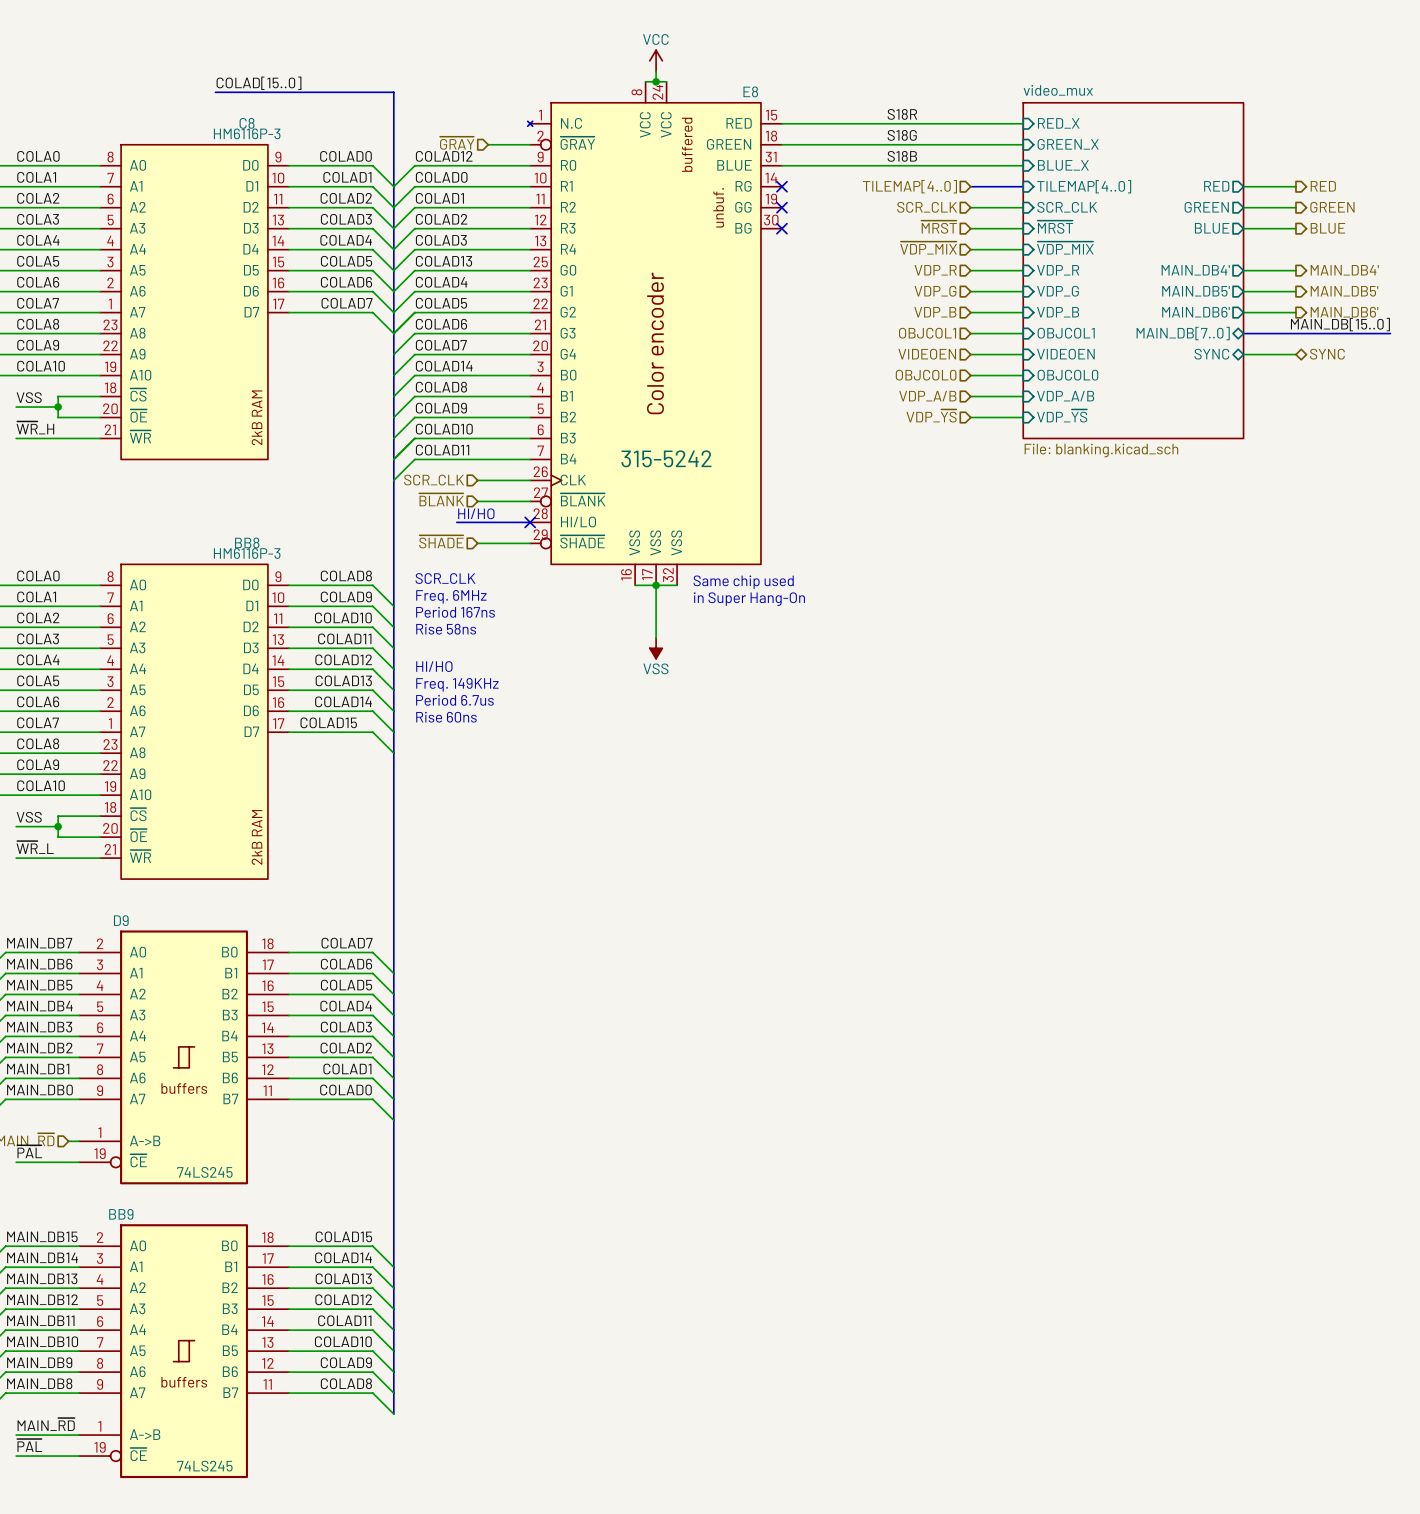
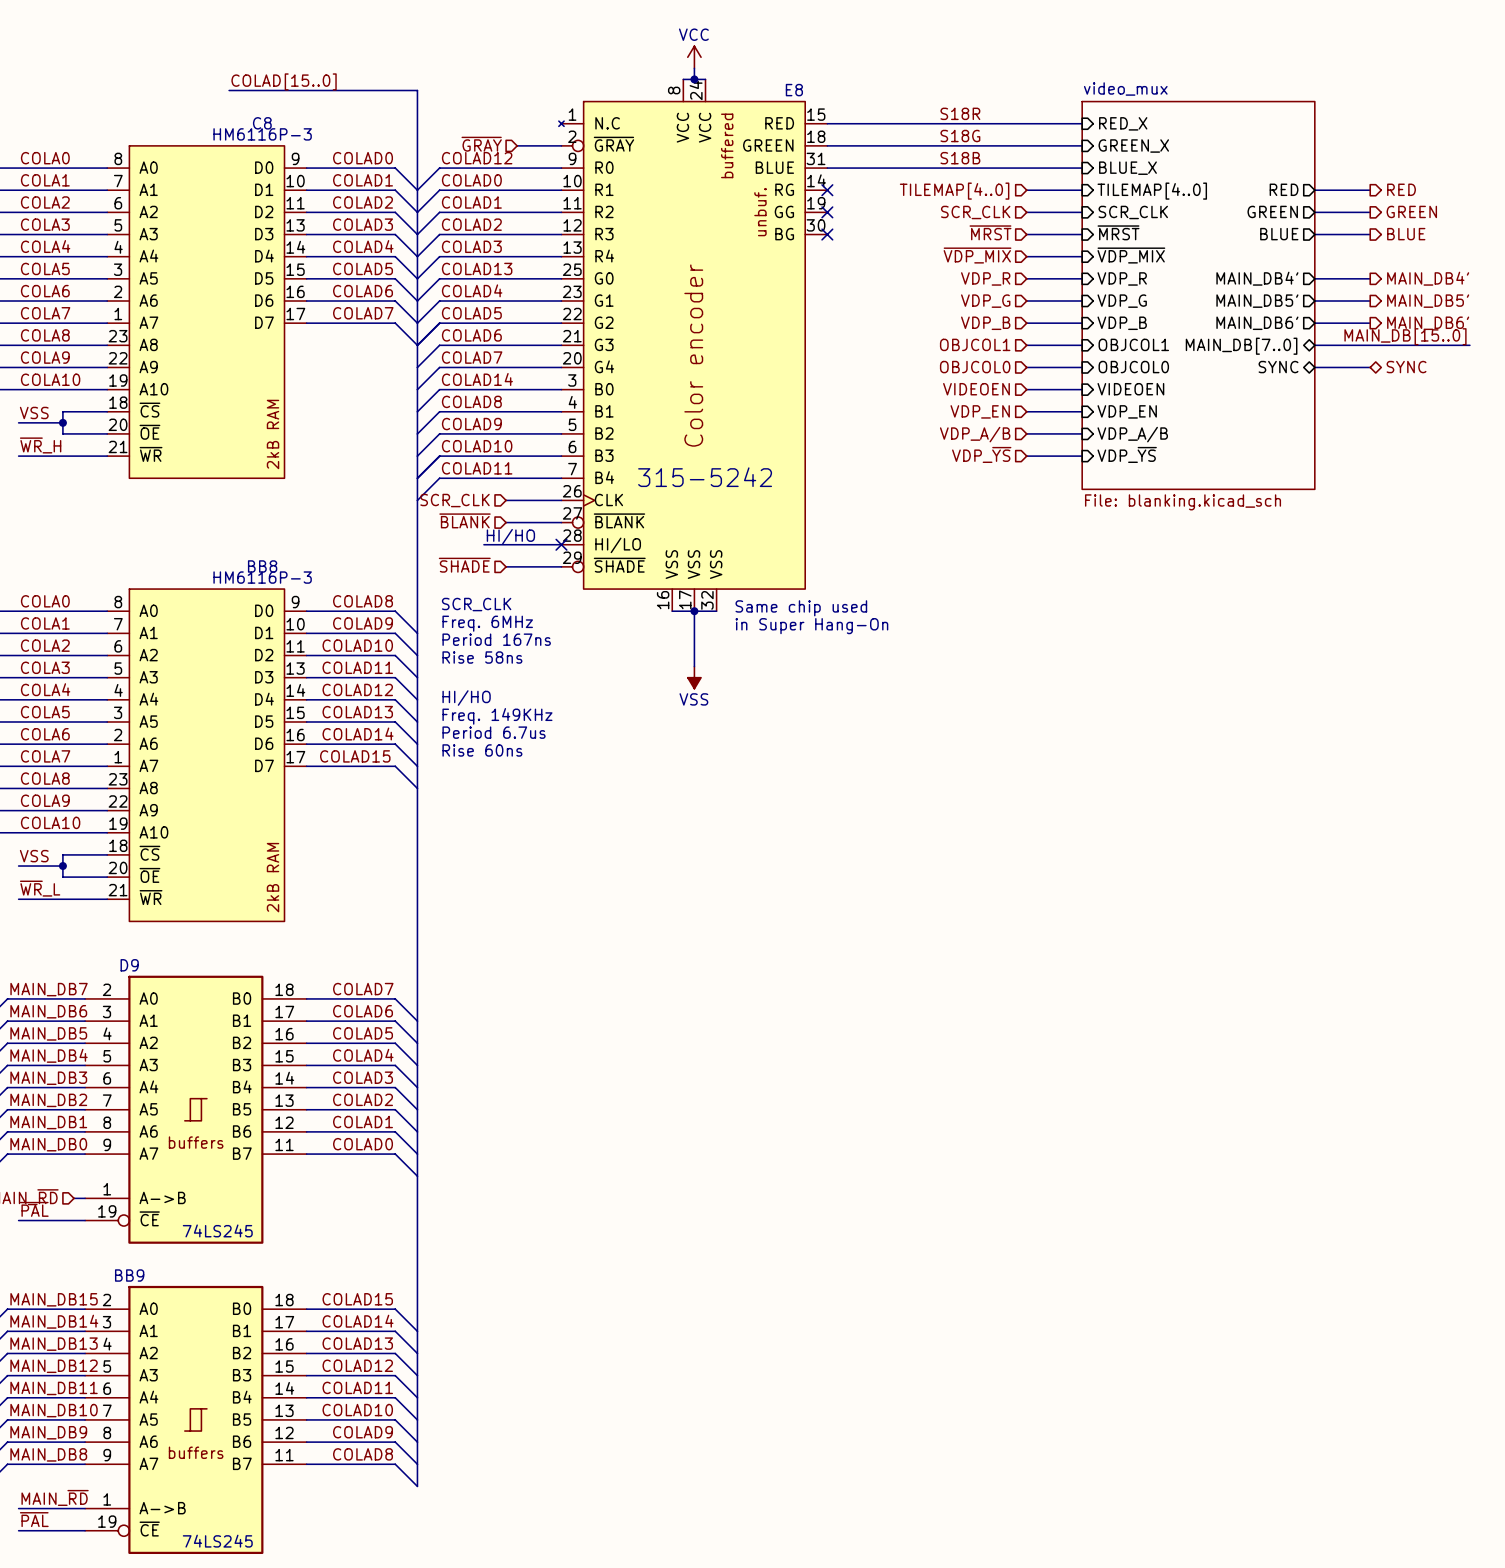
sheet video_mux: File: blanking.kicad_sch (1133, 270) -> none
sheet video_mux: none -> File: blanking.kicad_sch (1198, 295)
hierarchical label: VIDEOEN (927, 354) -> OBJCOL0 (975, 367)
sheet pin: VIDEOEN (1065, 354) -> OBJCOL0 (1133, 367)
hierarchical label: OBJCOL0 (926, 375) -> VIDEOEN (976, 389)
sheet pin: OBJCOL0 (1067, 375) -> VIDEOEN (1130, 389)
hierarchical label: VDP_A/B (927, 396) -> VDP_EN (980, 411)
sheet pin: VDP_A/B (1065, 396) -> VDP_EN (1127, 411)
hierarchical label: VDP_~{YS} (931, 415) -> VDP_A/B (975, 434)
sheet pin: VDP_~{YS} (1062, 415) -> VDP_A/B (1132, 434)
hierarchical label: none -> VDP_~{YS} (981, 454)
sheet pin: none -> VDP_~{YS} (1127, 454)
wire: none -> (1026, 456) (1082, 456)

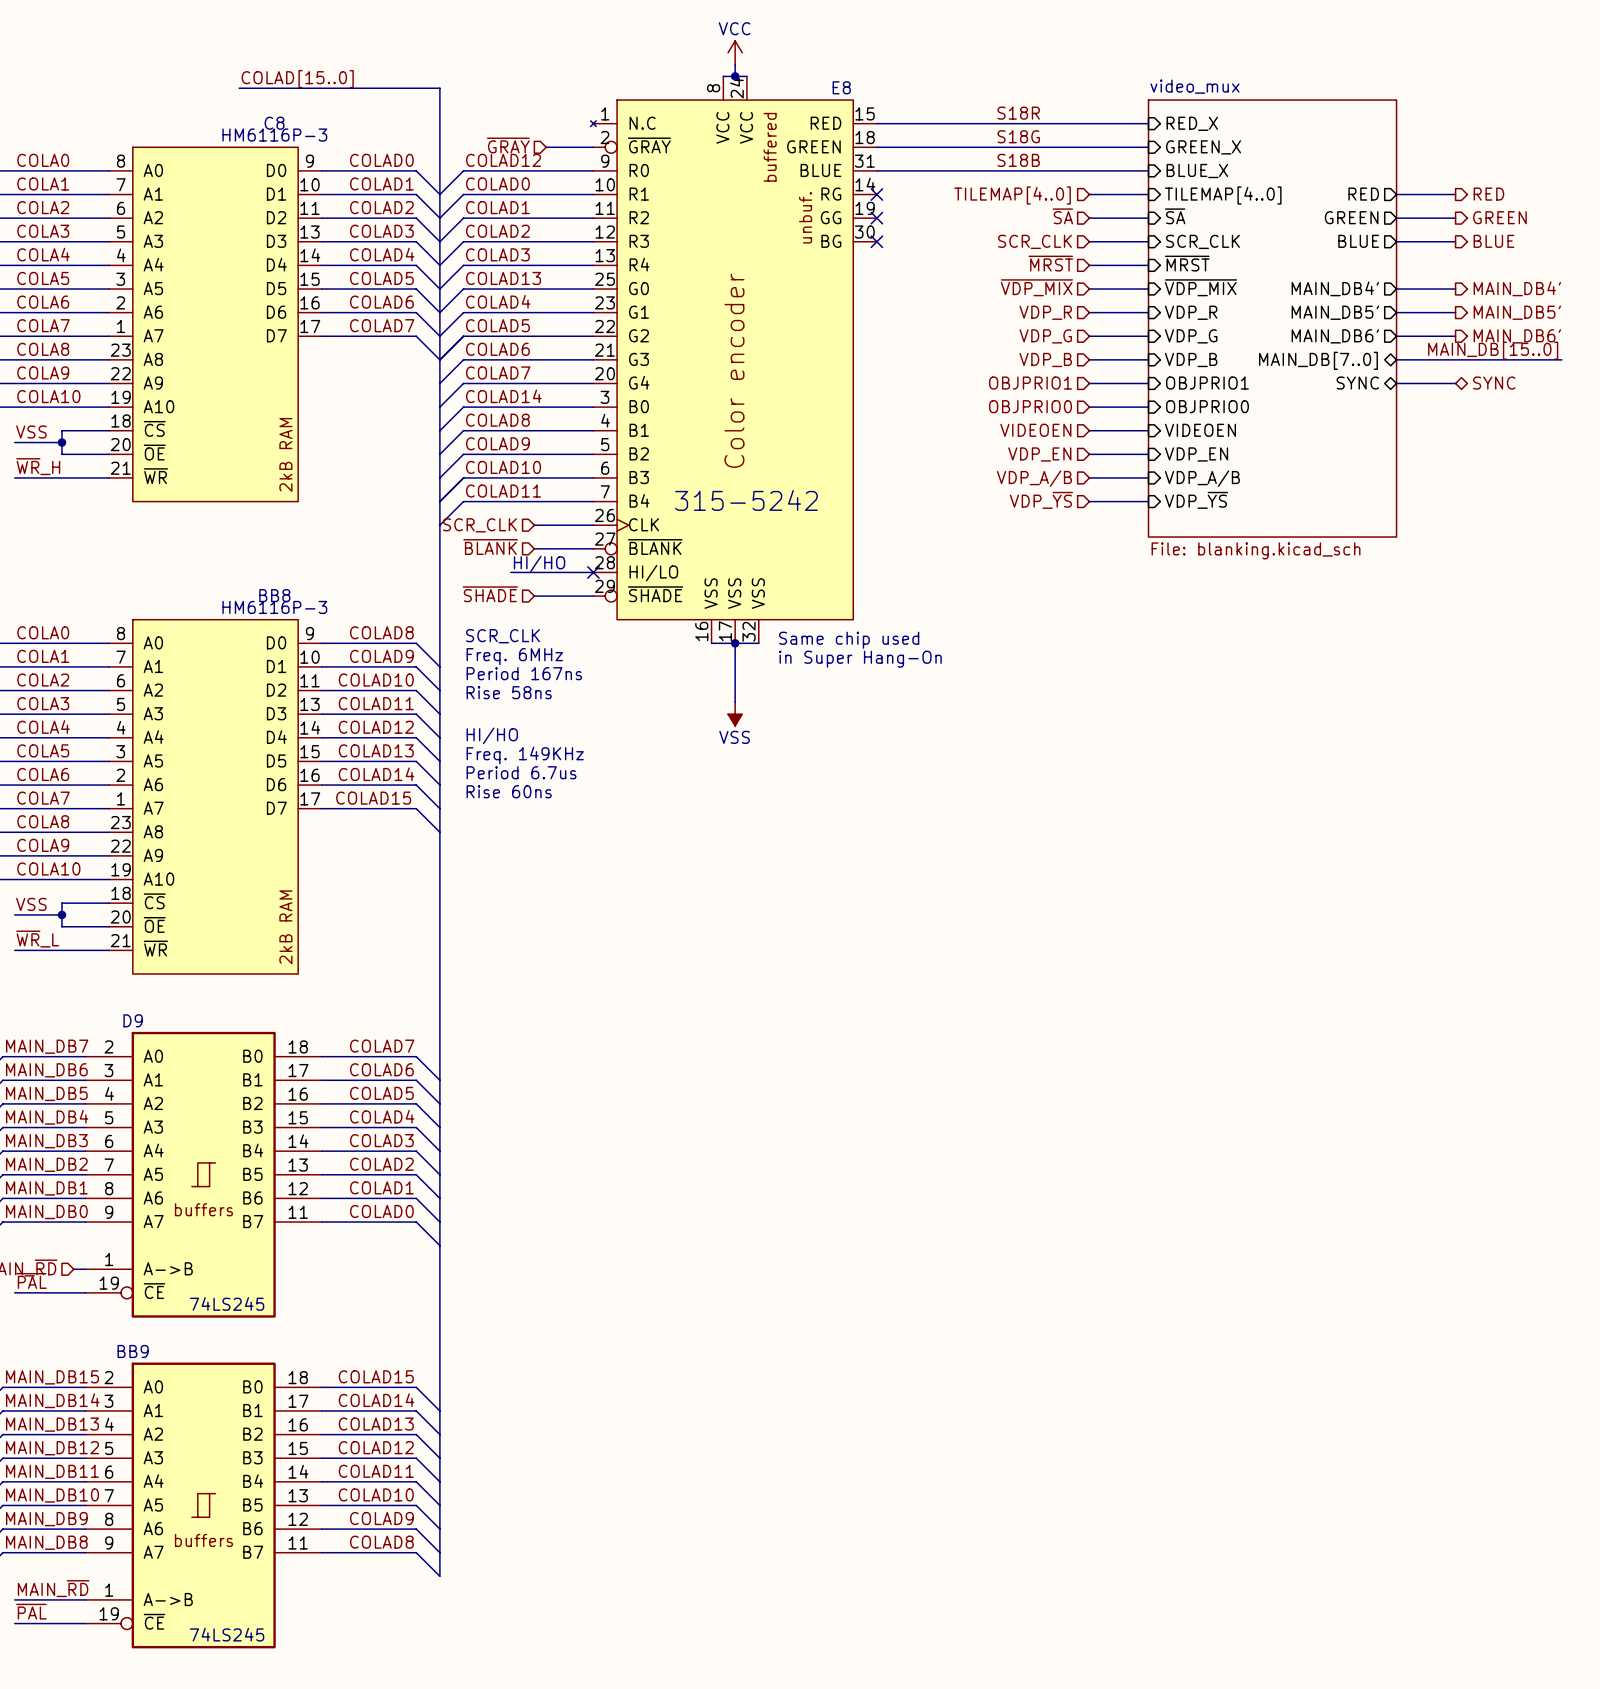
hierarchical label: SCR_CLK (975, 212) -> ~{SA} (1062, 216)
sheet pin: SCR_CLK (1133, 212) -> ~{SA} (1175, 216)
hierarchical label: ~{MRST} (990, 232) -> SCR_CLK (1035, 241)
sheet pin: ~{MRST} (1118, 232) -> SCR_CLK (1202, 241)
hierarchical label: ~{VDP_MIX} (977, 255) -> ~{MRST} (1050, 263)
sheet pin: ~{VDP_MIX} (1131, 255) -> ~{MRST} (1187, 263)
hierarchical label: VDP_R (985, 278) -> ~{VDP_MIX} (1036, 287)
sheet pin: VDP_R (1122, 278) -> ~{VDP_MIX} (1200, 287)
sheet video_mux: File: blanking.kicad_sch (1198, 295) -> none
hierarchical label: VDP_G (985, 301) -> VDP_R (1045, 312)
sheet pin: VDP_G (1122, 301) -> VDP_R (1191, 312)
sheet video_mux: none -> File: blanking.kicad_sch (1272, 318)
hierarchical label: VDP_B (985, 323) -> VDP_G (1045, 336)
sheet pin: VDP_B (1122, 323) -> VDP_G (1191, 336)
hierarchical label: OBJCOL1 (975, 344) -> VDP_B (1045, 359)
sheet pin: OBJCOL1 (1133, 344) -> VDP_B (1191, 359)
hierarchical label: OBJCOL0 (975, 367) -> OBJPRIO1 (1030, 383)
sheet pin: OBJCOL0 (1133, 367) -> OBJPRIO1 (1207, 383)
hierarchical label: VIDEOEN (976, 389) -> OBJPRIO0 (1030, 406)
sheet pin: VIDEOEN (1130, 389) -> OBJPRIO0 (1207, 406)
hierarchical label: VDP_EN (980, 411) -> VIDEOEN (1035, 430)
sheet pin: VDP_EN (1127, 411) -> VIDEOEN (1200, 430)
hierarchical label: VDP_A/B (975, 434) -> VDP_EN (1039, 454)
sheet pin: VDP_A/B (1132, 434) -> VDP_EN (1196, 454)
hierarchical label: VDP_~{YS} (981, 454) -> VDP_A/B (1034, 478)
sheet pin: VDP_~{YS} (1127, 454) -> VDP_A/B (1202, 478)
hierarchical label: none -> VDP_~{YS} (1041, 500)
sheet pin: none -> VDP_~{YS} (1196, 500)
wire: none -> (1089, 501) (1148, 501)

